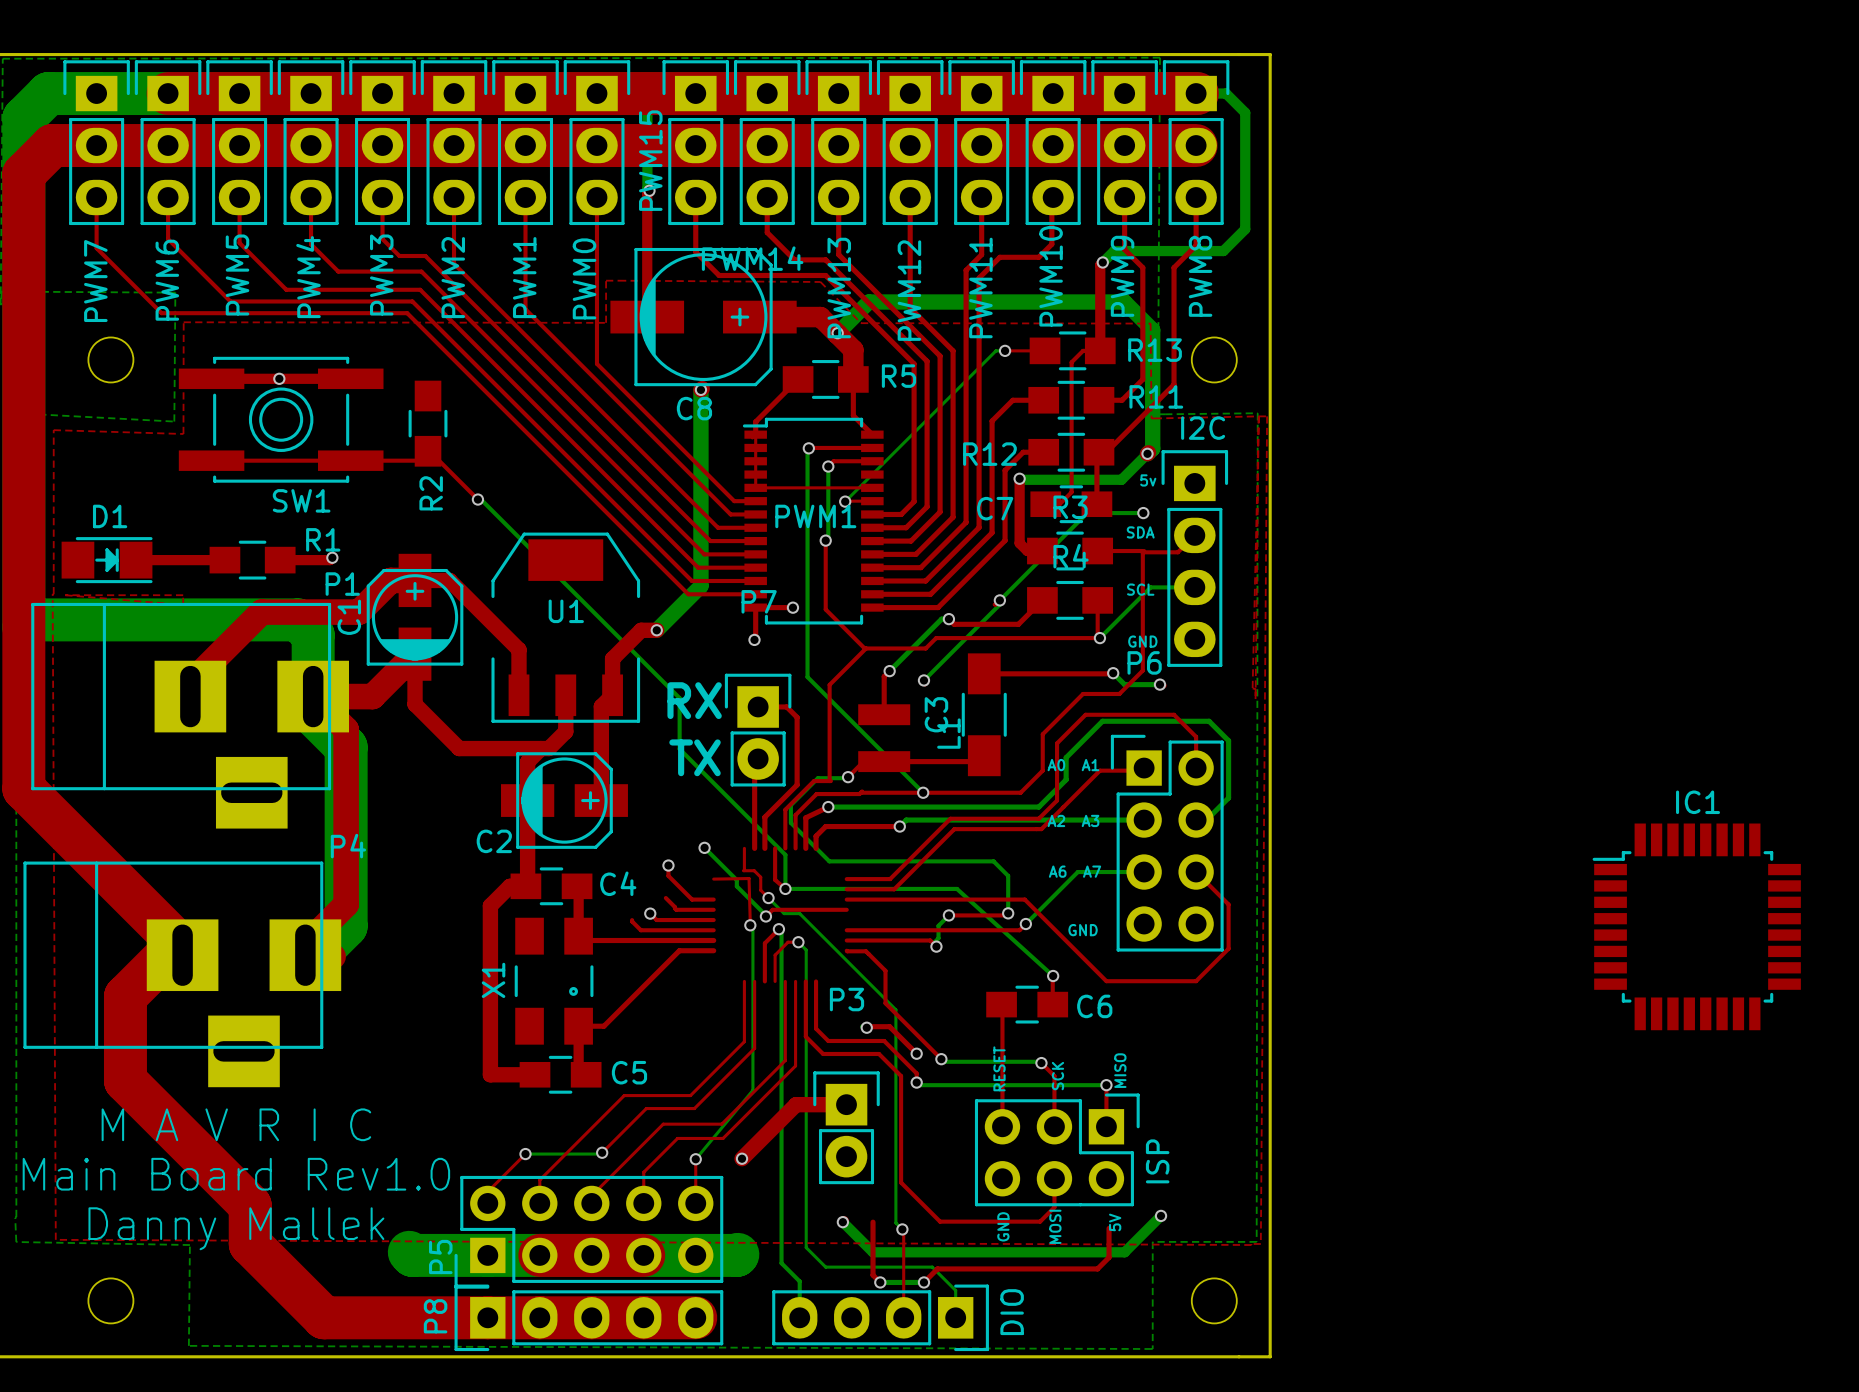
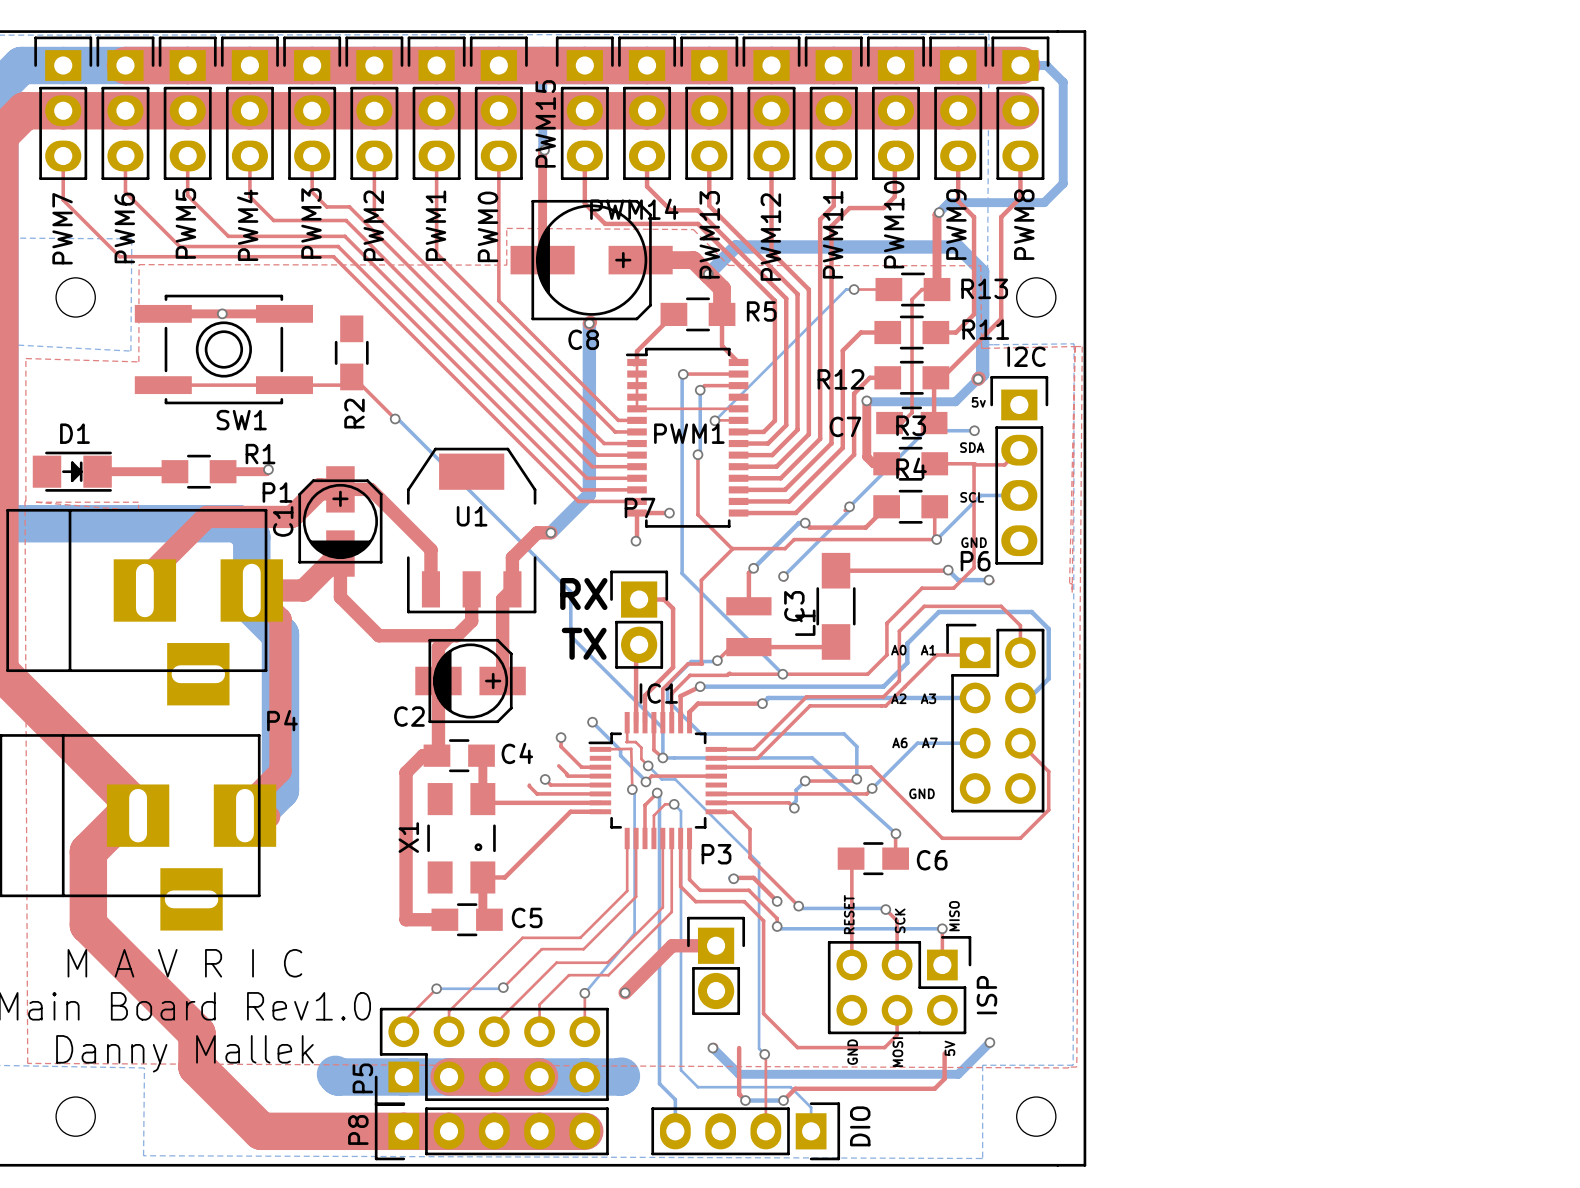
IC1 footprint: [1592, 823, 1801, 1031] -> [588, 711, 727, 850]

